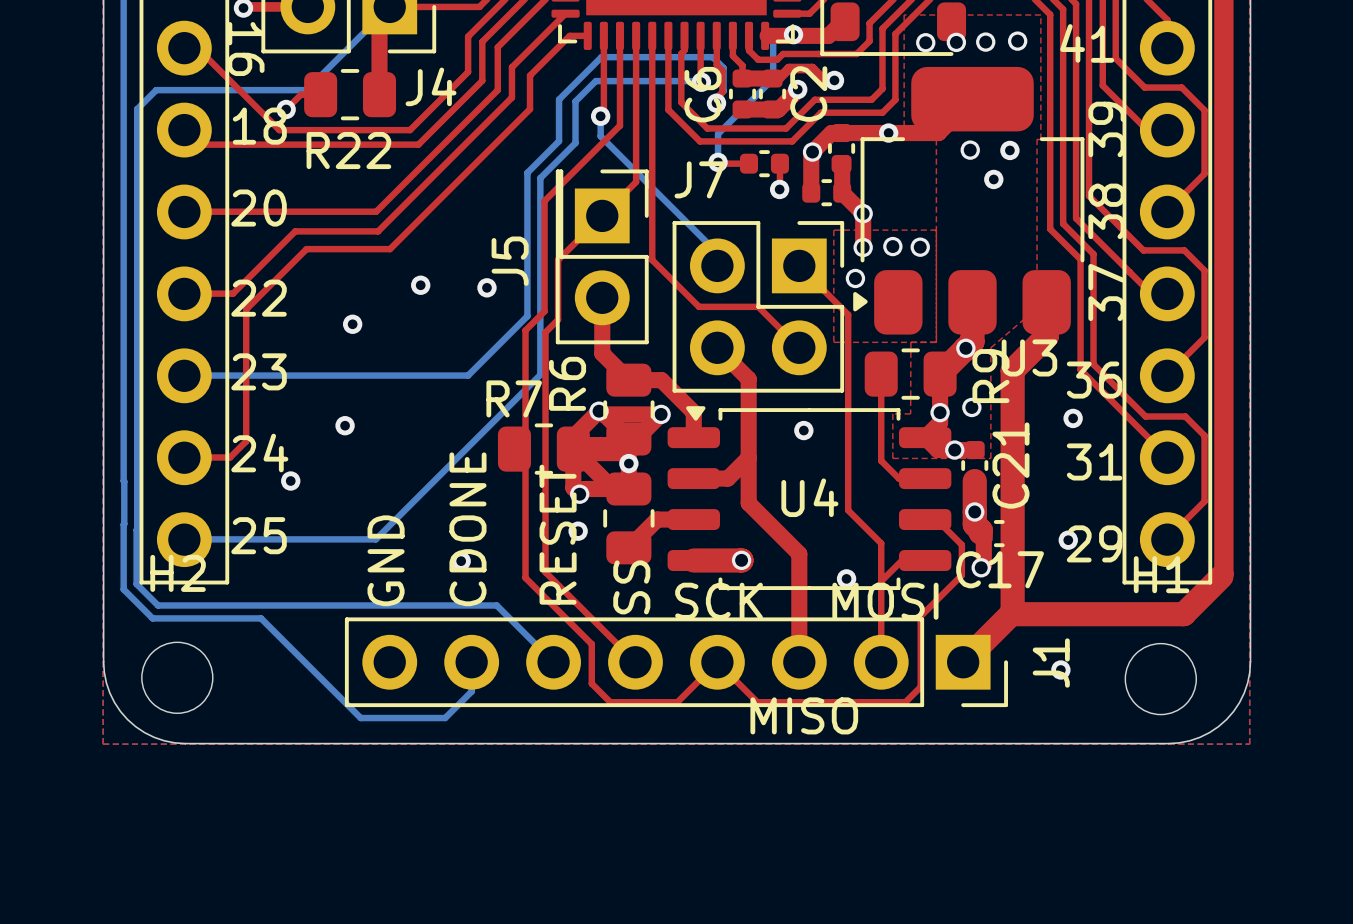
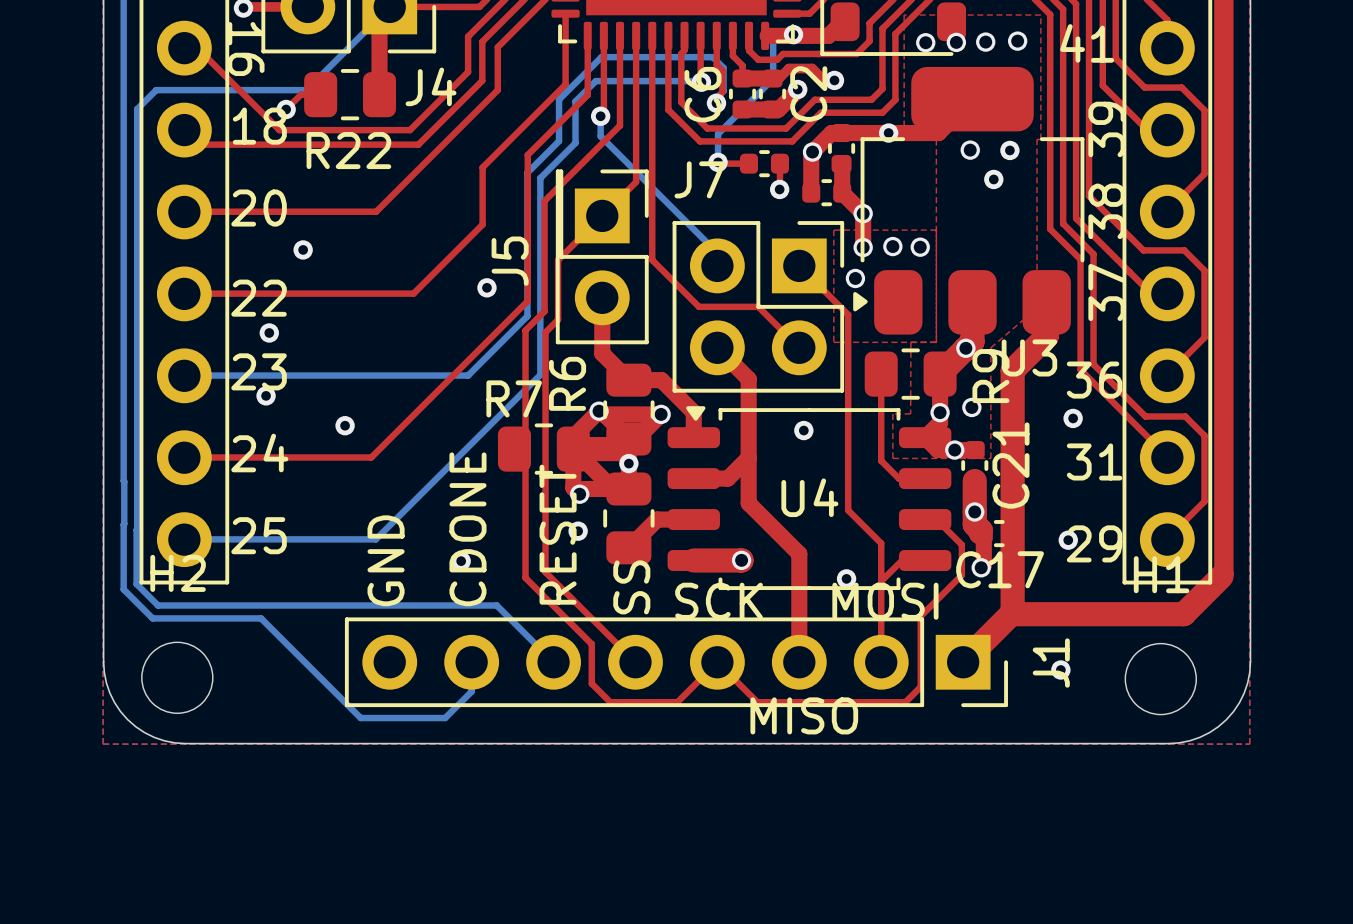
top track: (565, 13) (511, 67) (511, 97) (378, 231) (295, 231) (233, 293) -> (565, 13) (565, 84) (482, 167) (482, 224) (413, 293) (233, 293)
top track: (587, 35) (569, 35) (530, 75) (530, 109) (390, 249) (306, 249) (246, 309) (246, 441) (230, 457) -> (587, 35) (587, 94) (527, 154) (527, 301) (371, 457) (230, 457)
via: none -> (303, 249)
via: (420, 285) -> none
via: (352, 324) -> none
via: none -> (269, 332)
via: none -> (266, 395)
via: (290, 481) -> none

